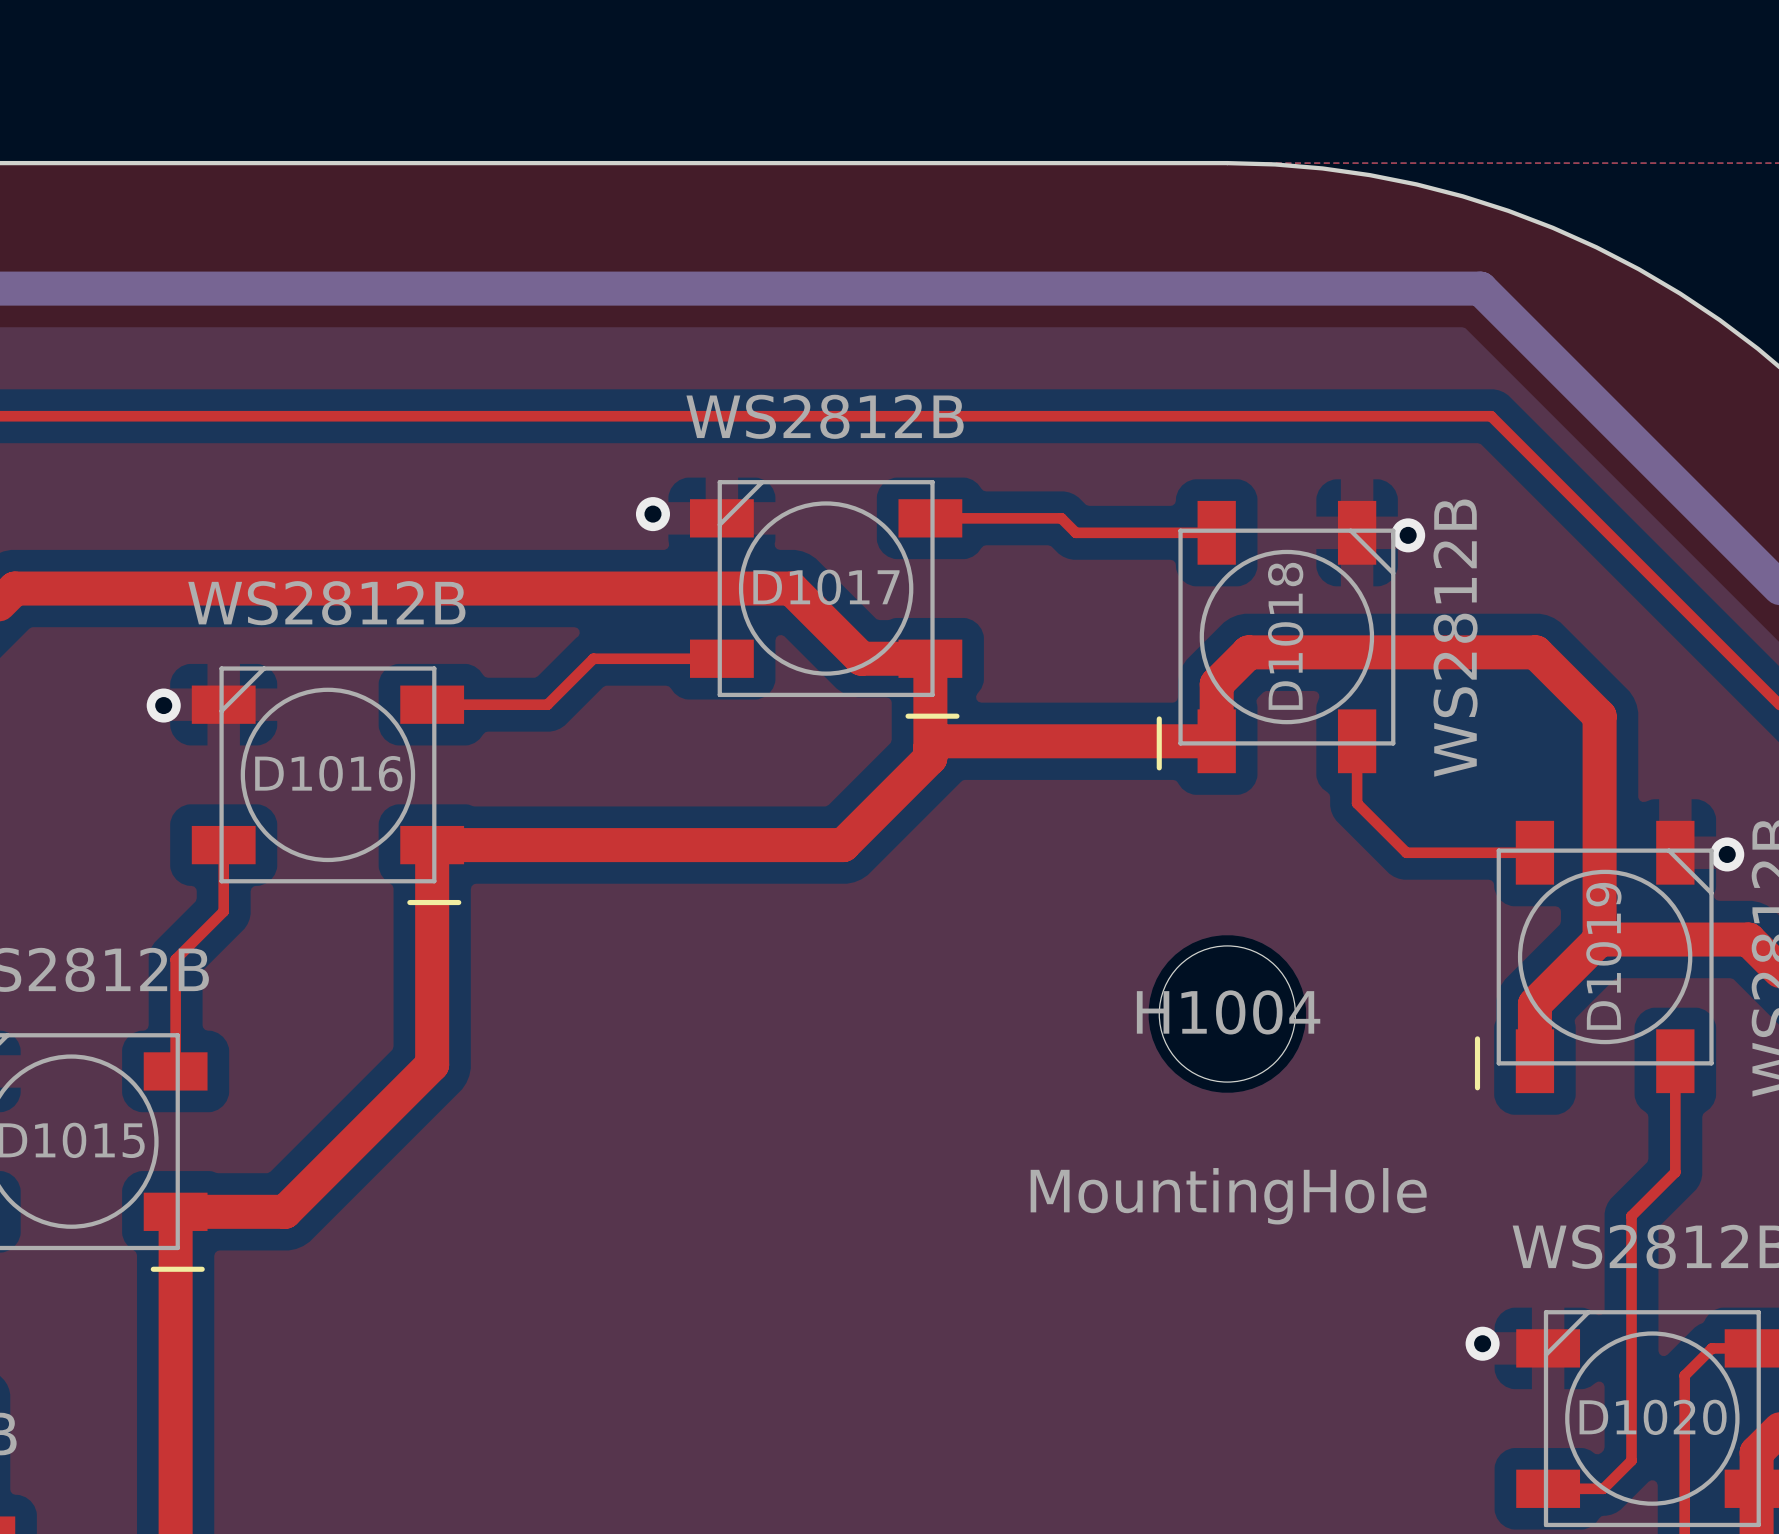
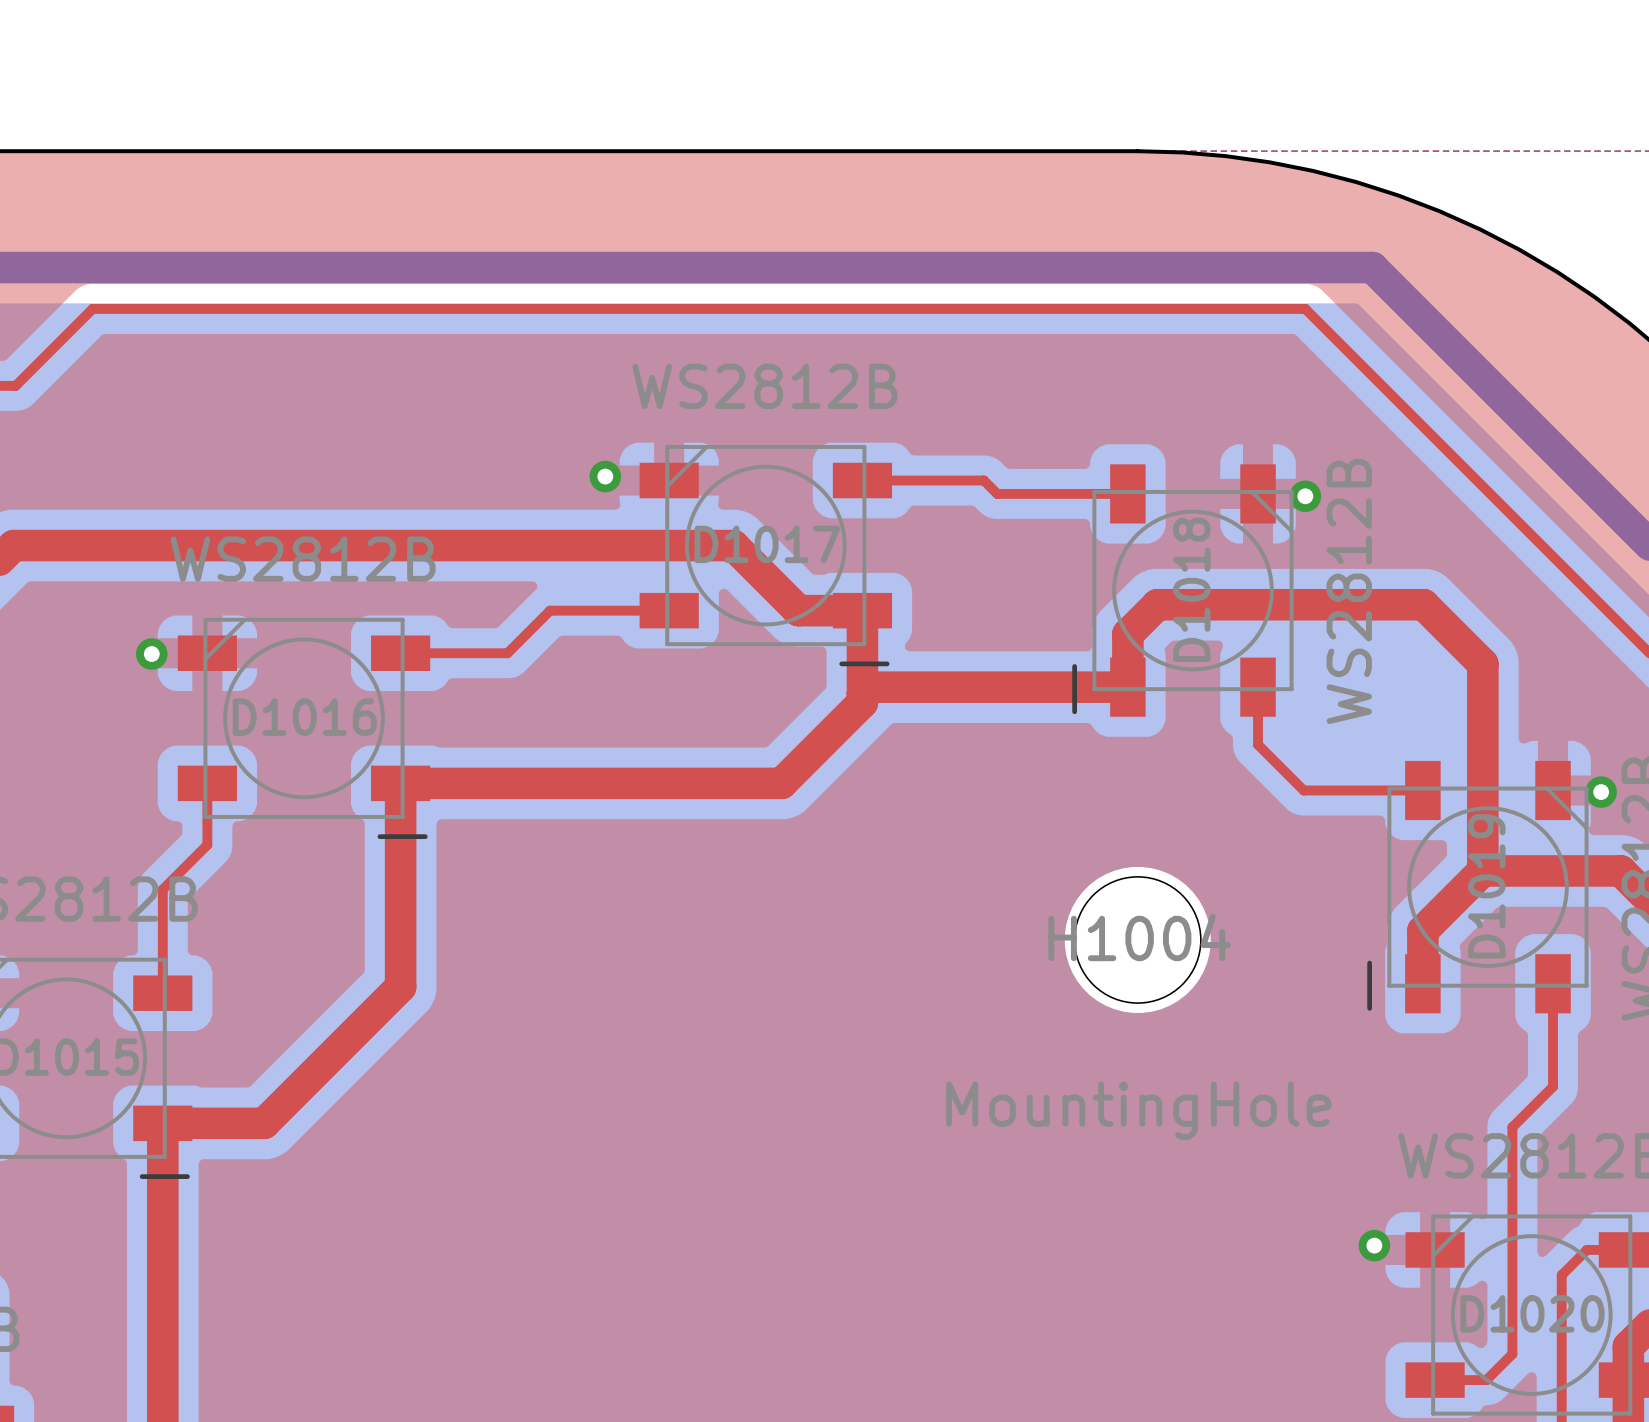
top track: (16, 416) (1491, 416) -> (15, 385) (92, 308) (1305, 308) (1382, 385)

